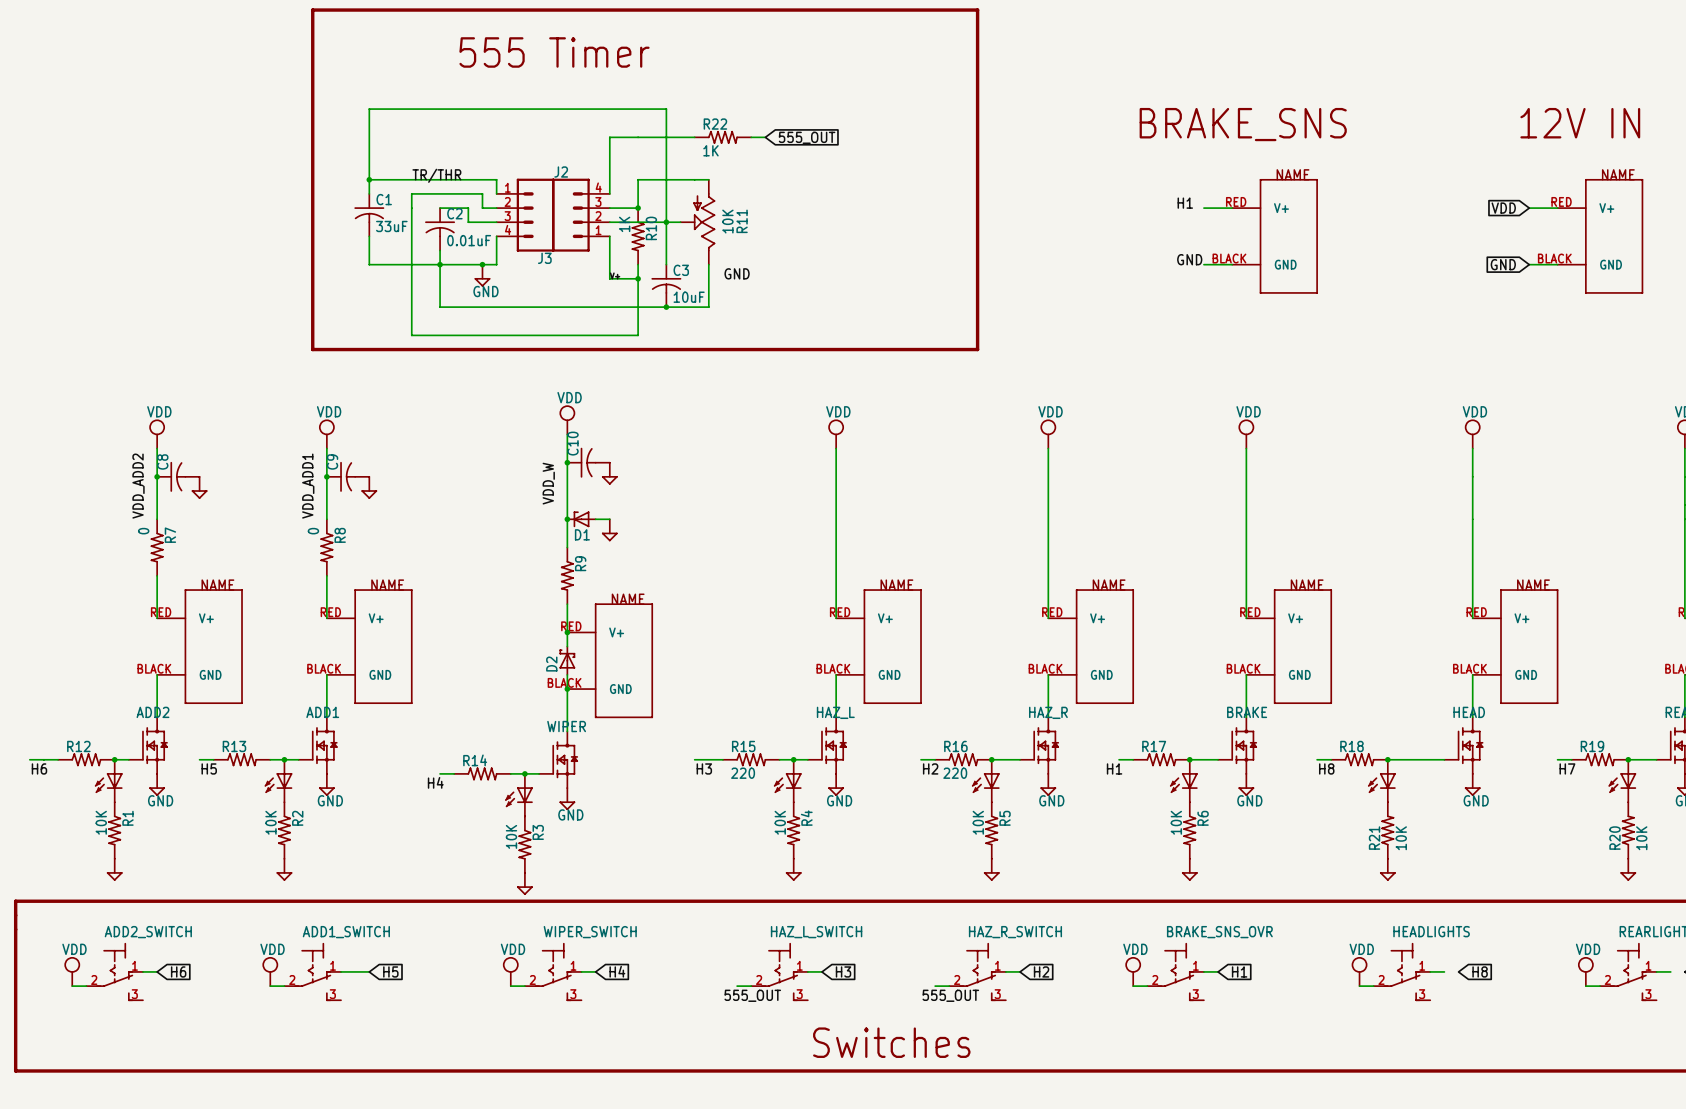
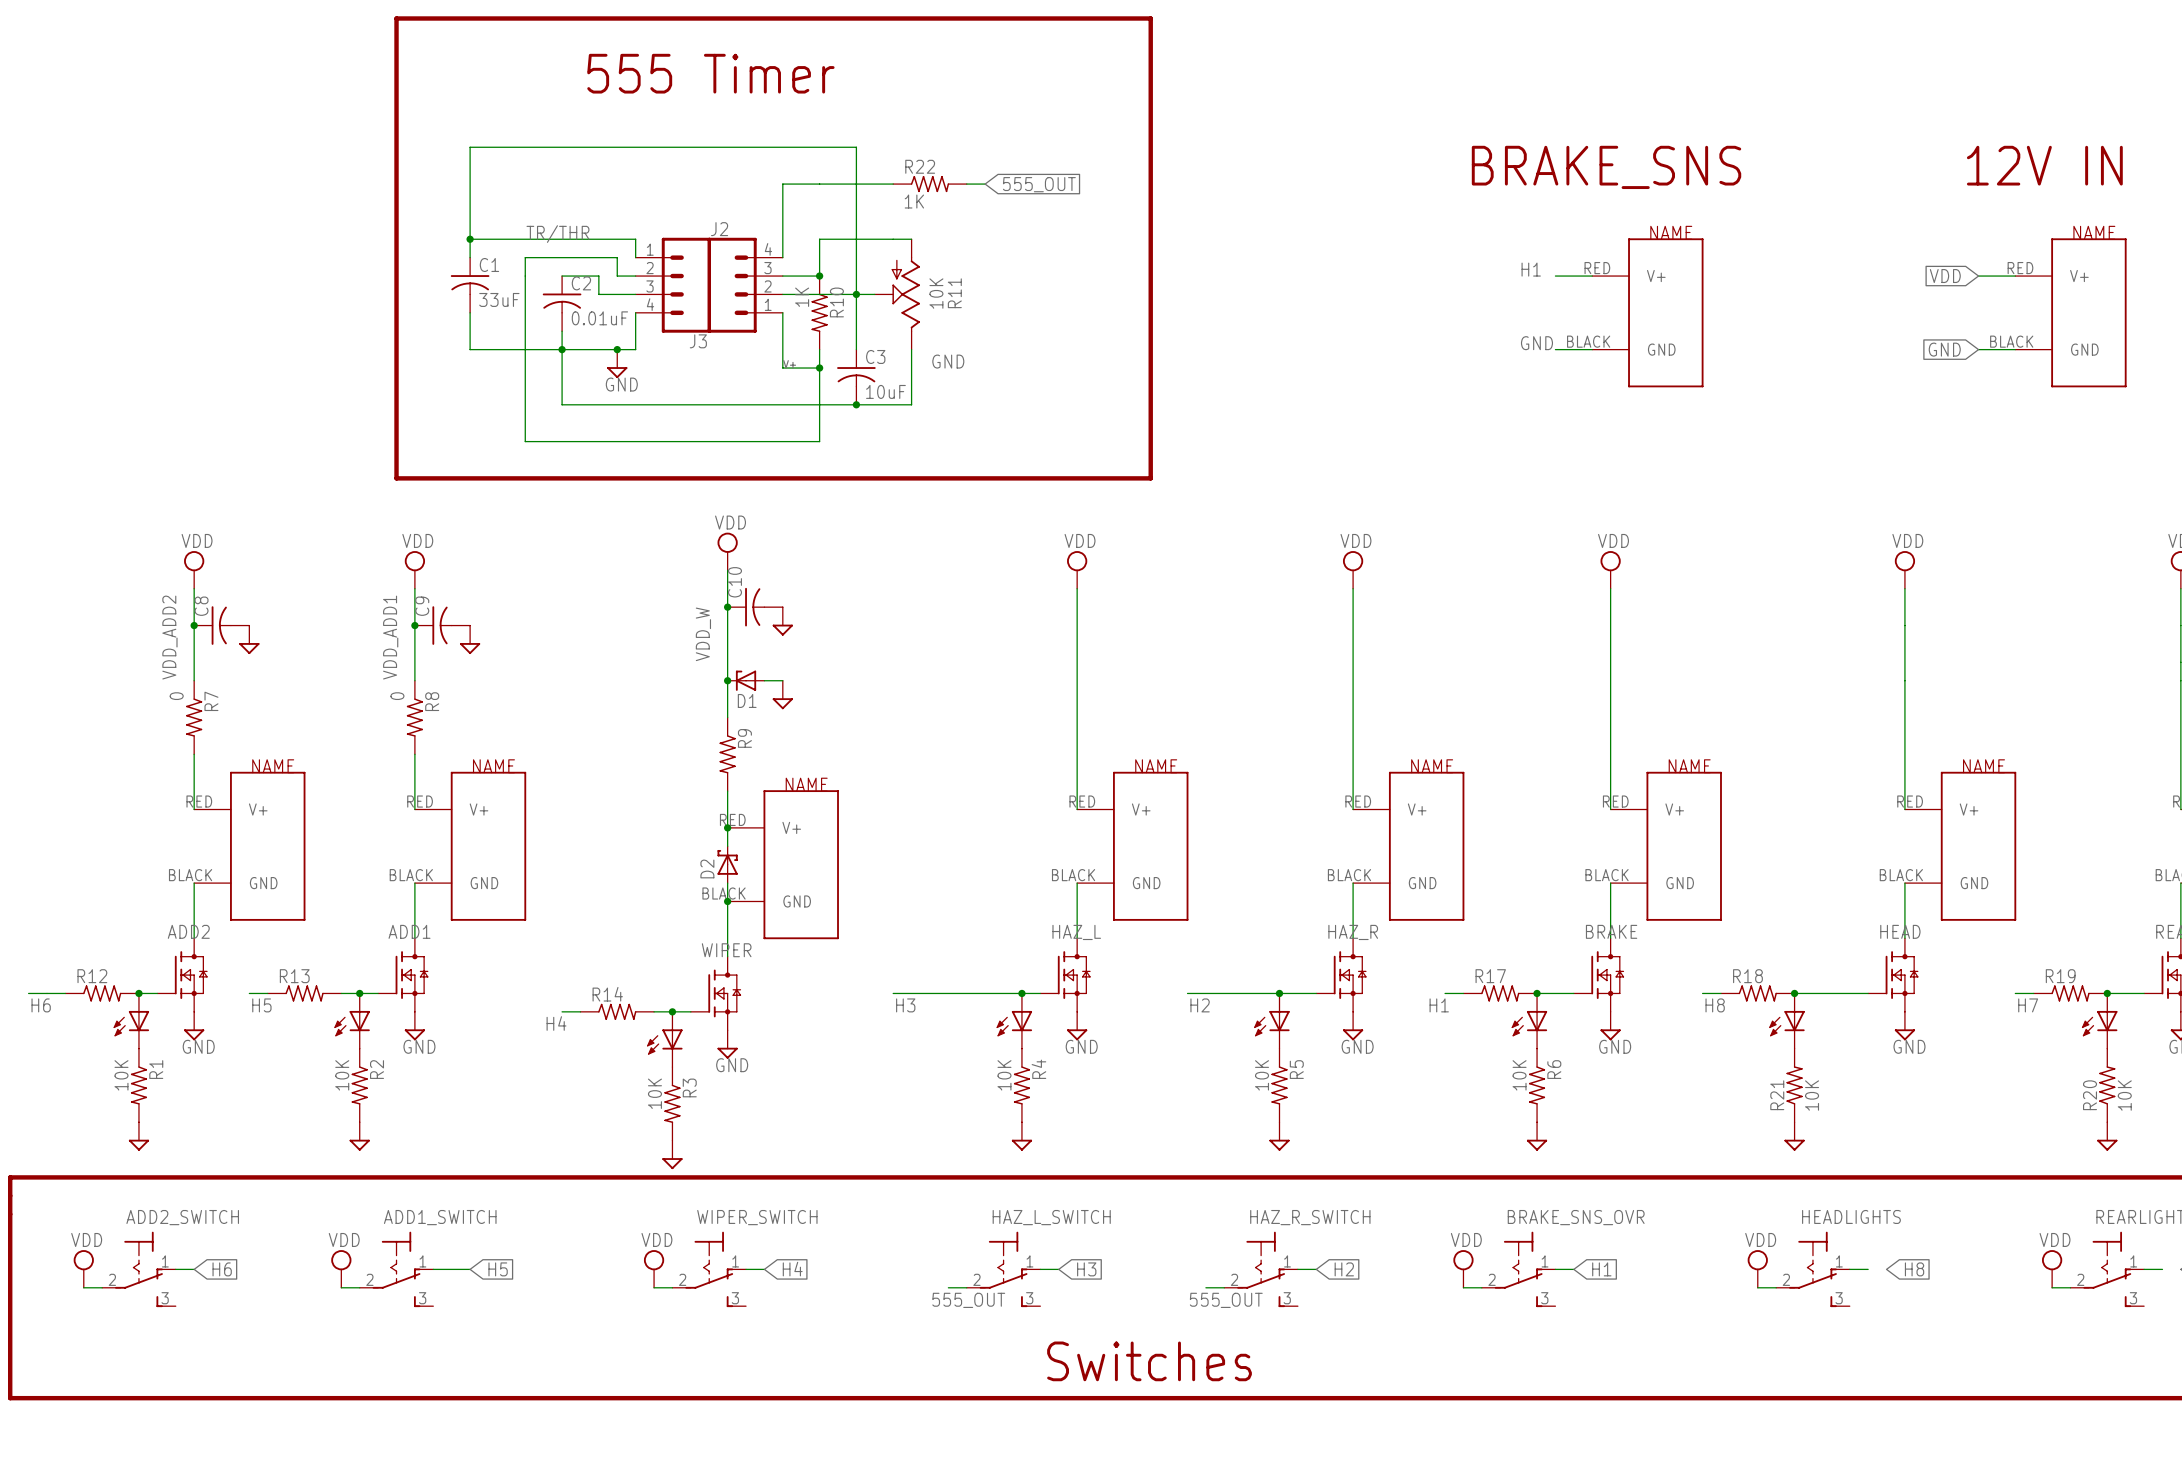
line: (892, 10) (977, 10) (977, 349) (312, 349) -> (1150, 18) (1150, 478) (396, 478) (396, 459)
R15: 220 (751, 759) -> none
R16: 220 (963, 759) -> none

